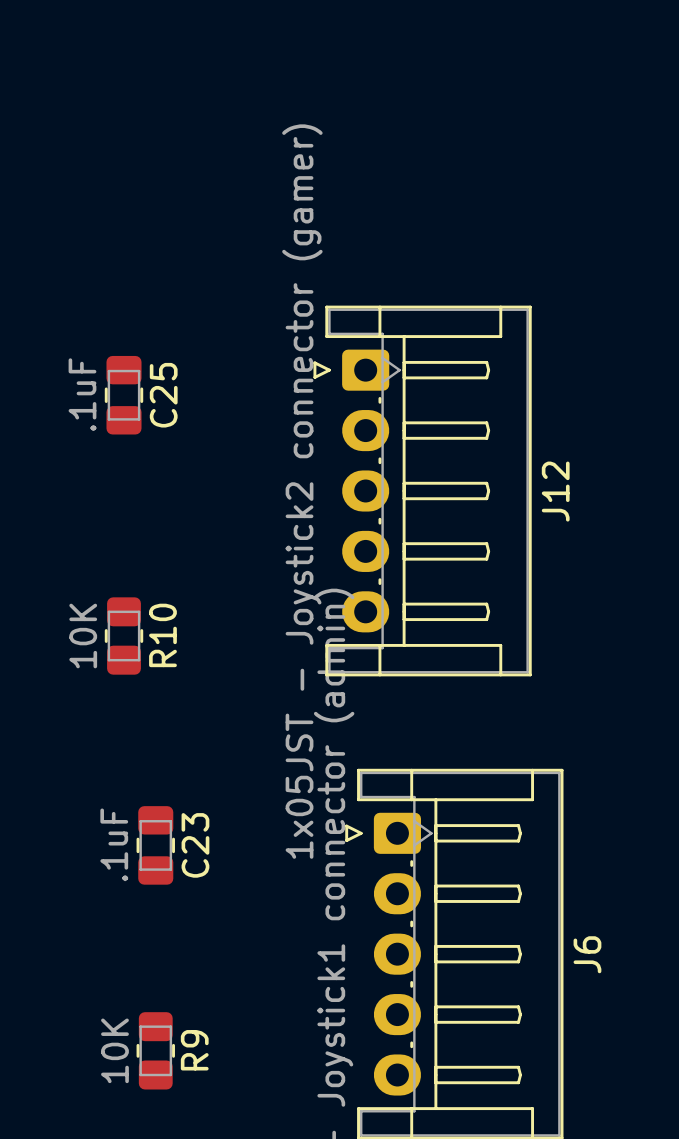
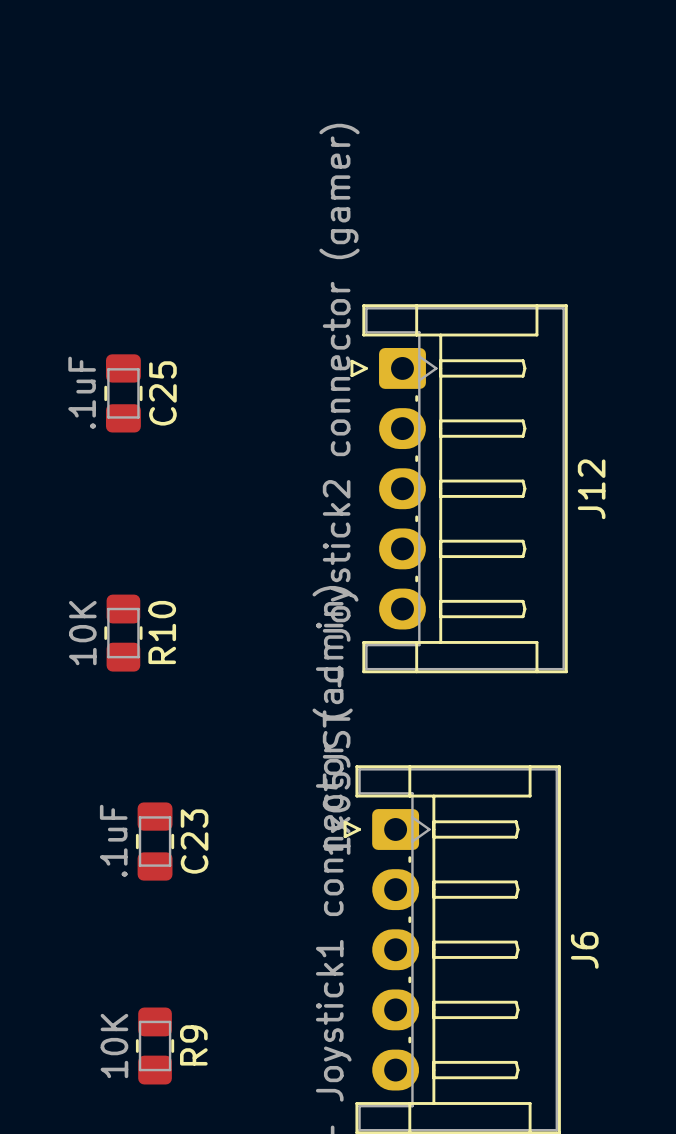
J12 position: (422, 490) -> (459, 488)

